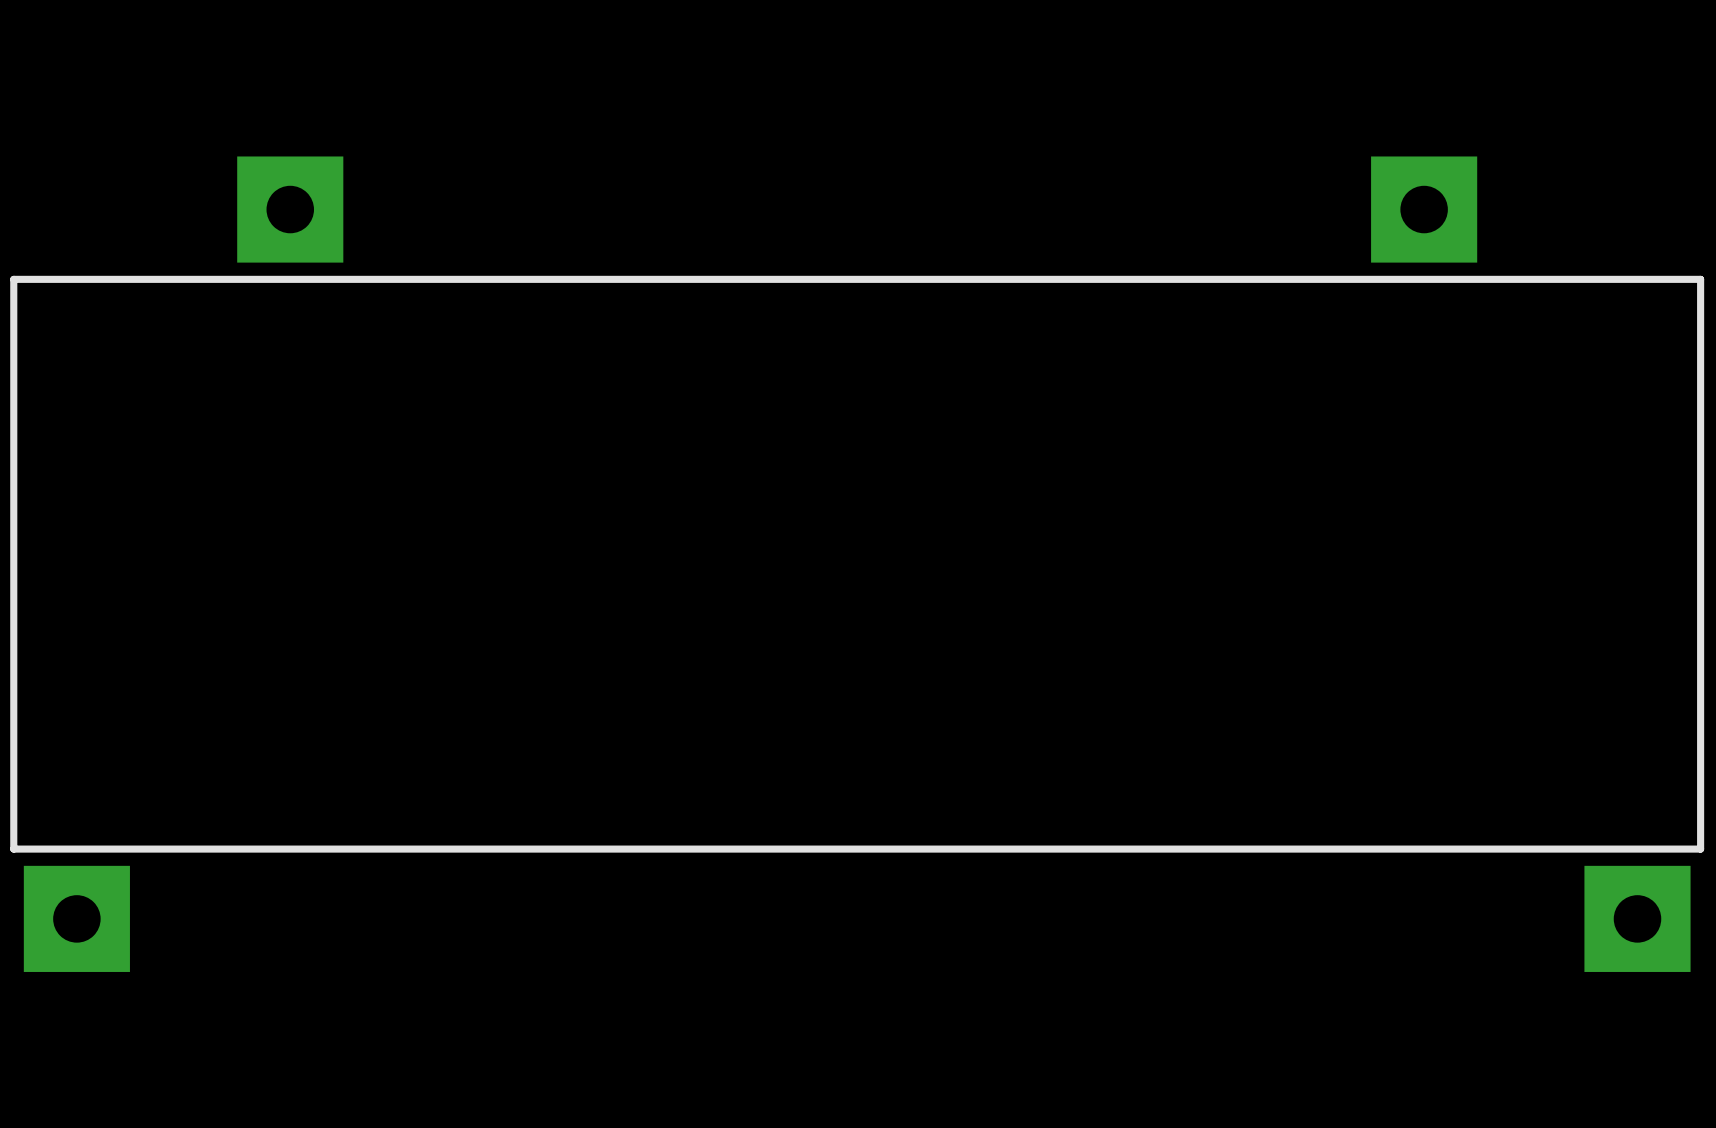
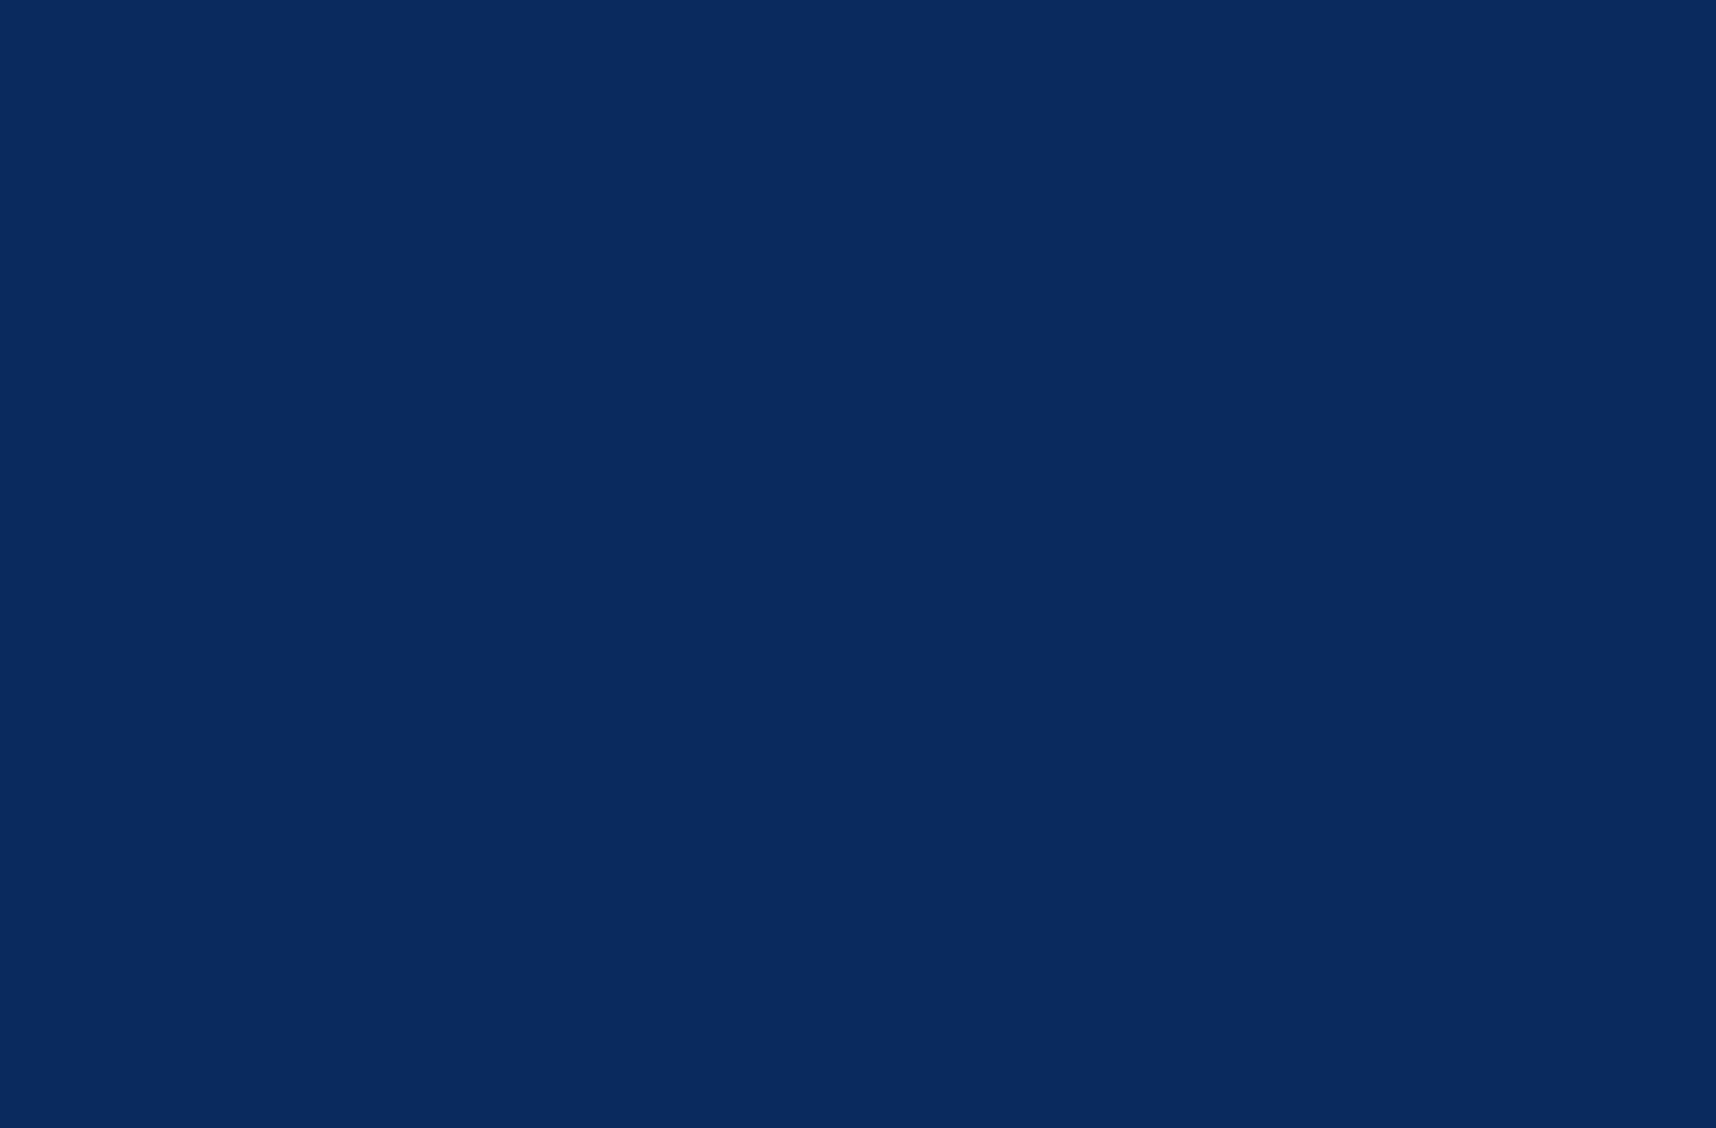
part: (857, 564) -> none

